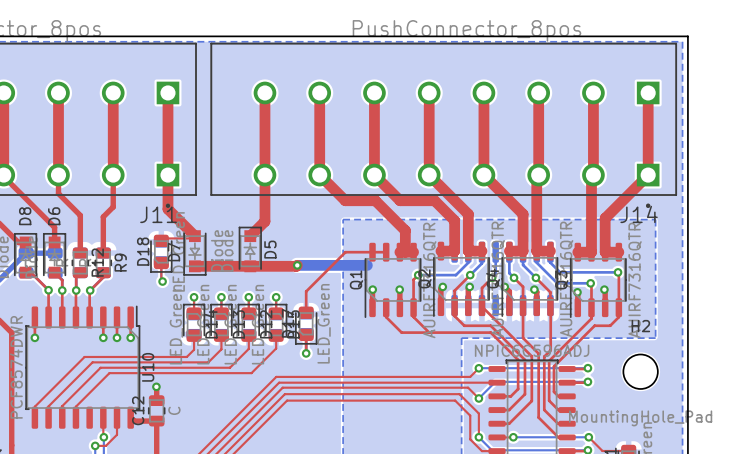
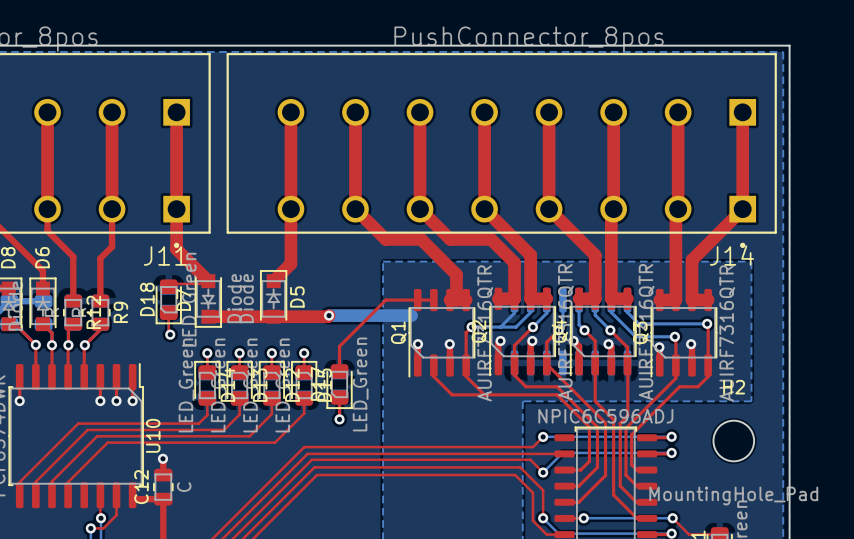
bottom track: none -> (514, 300) (514, 313) (500, 327)

